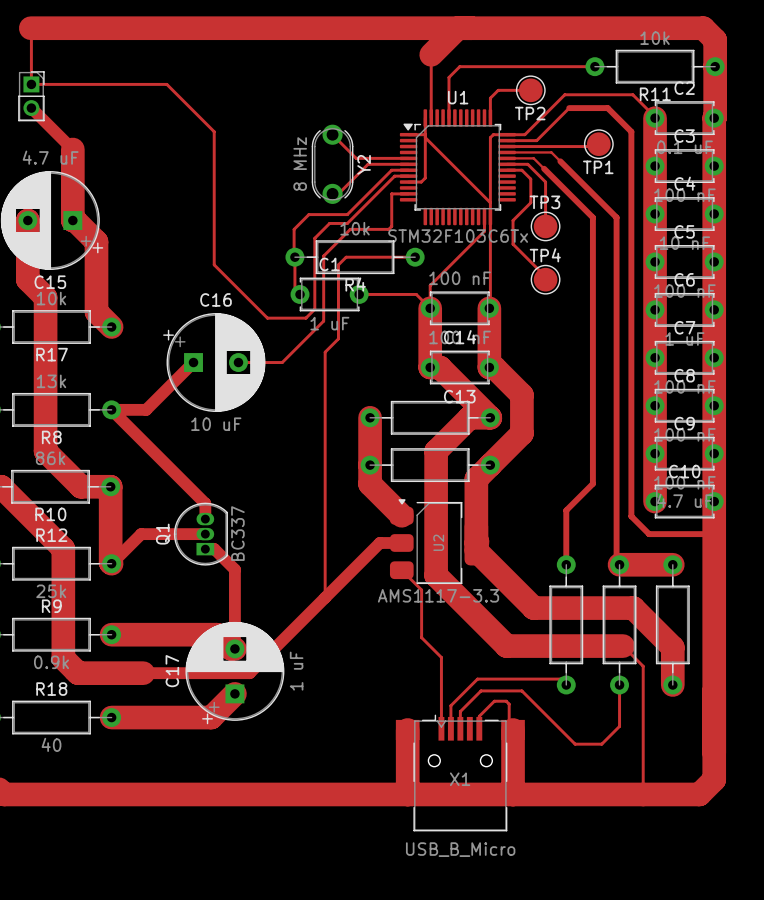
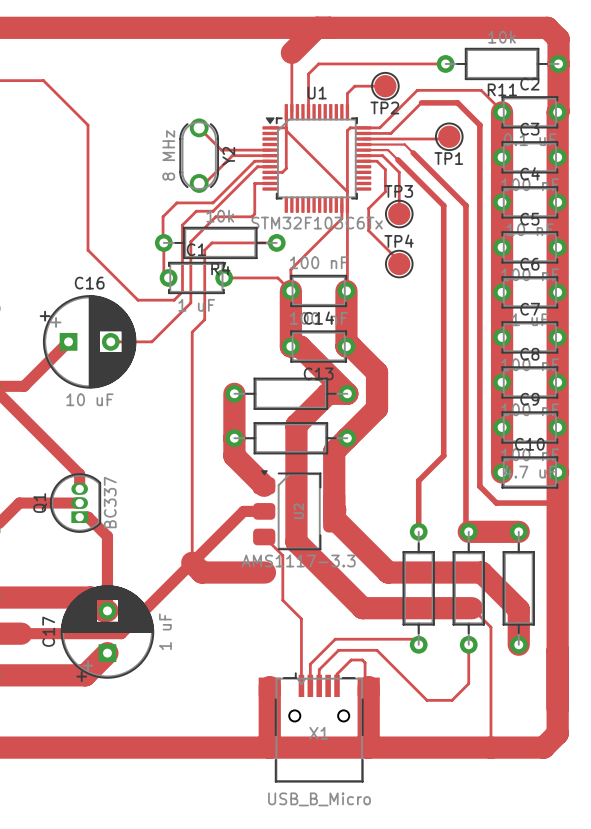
top track: none -> (192, 562) (201, 572) (264, 572)

